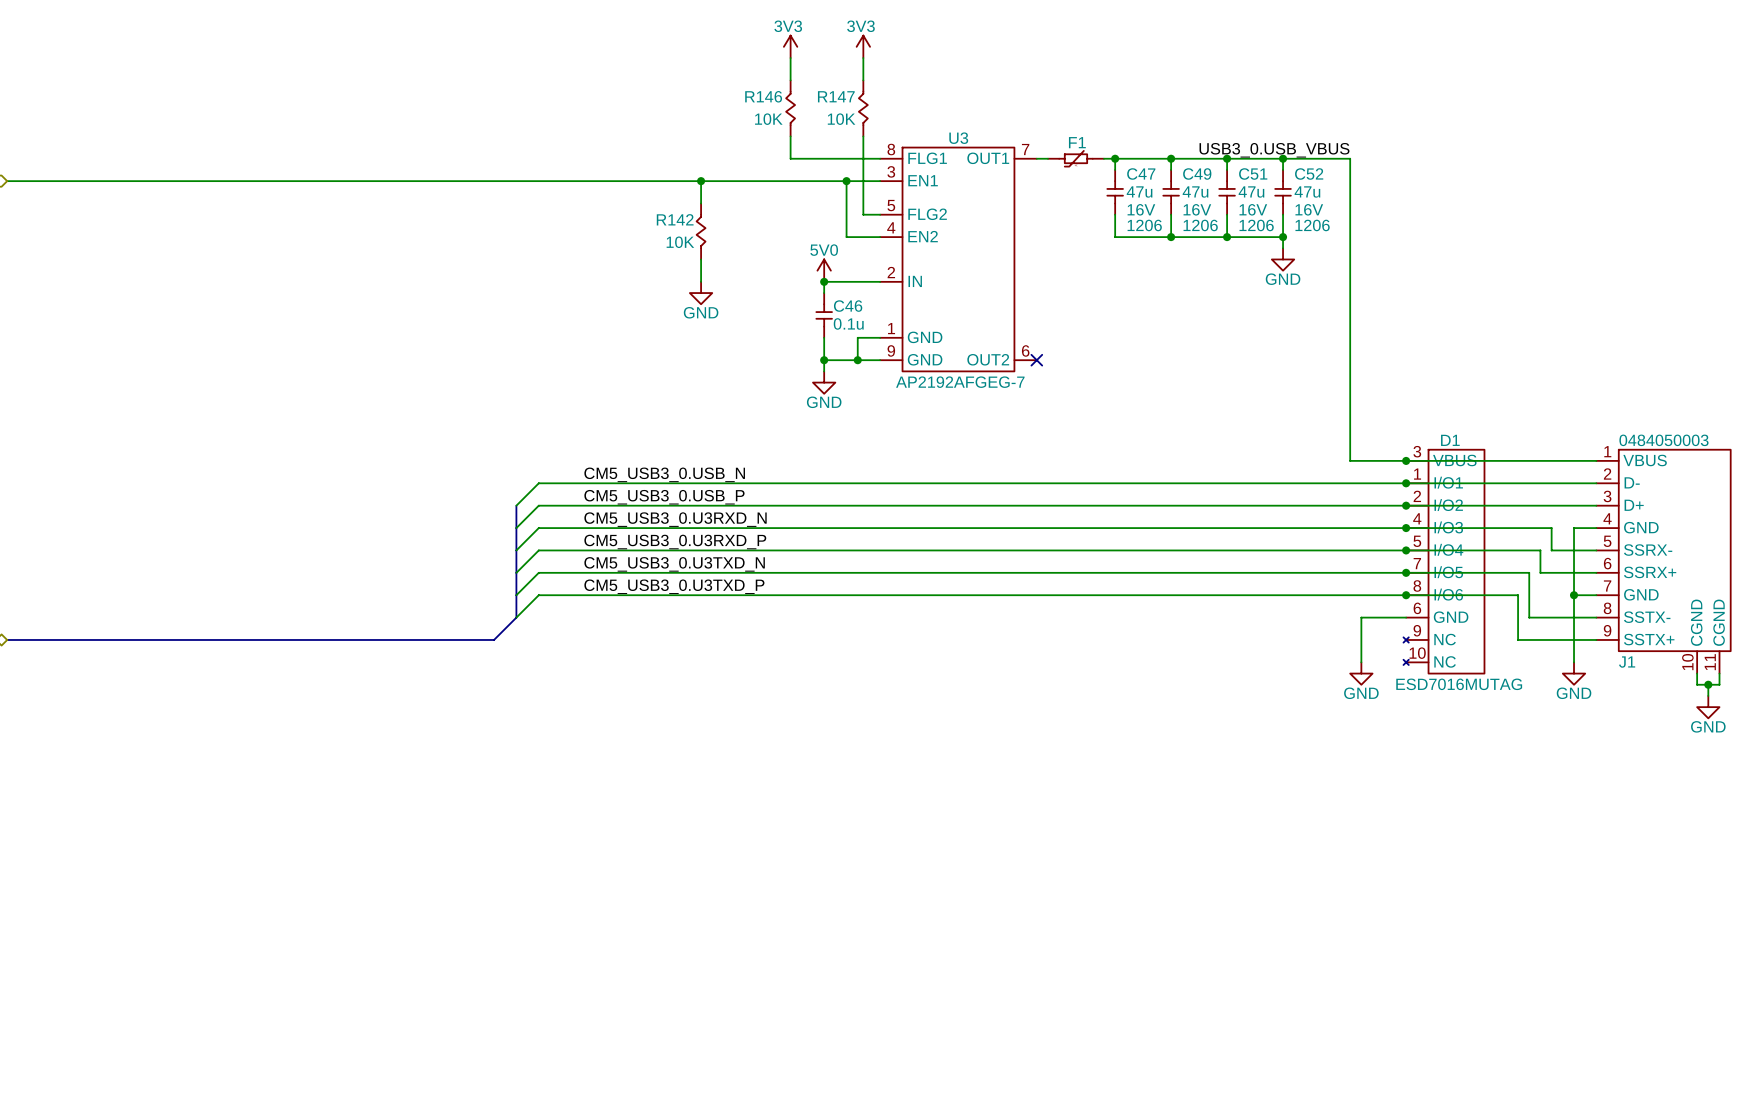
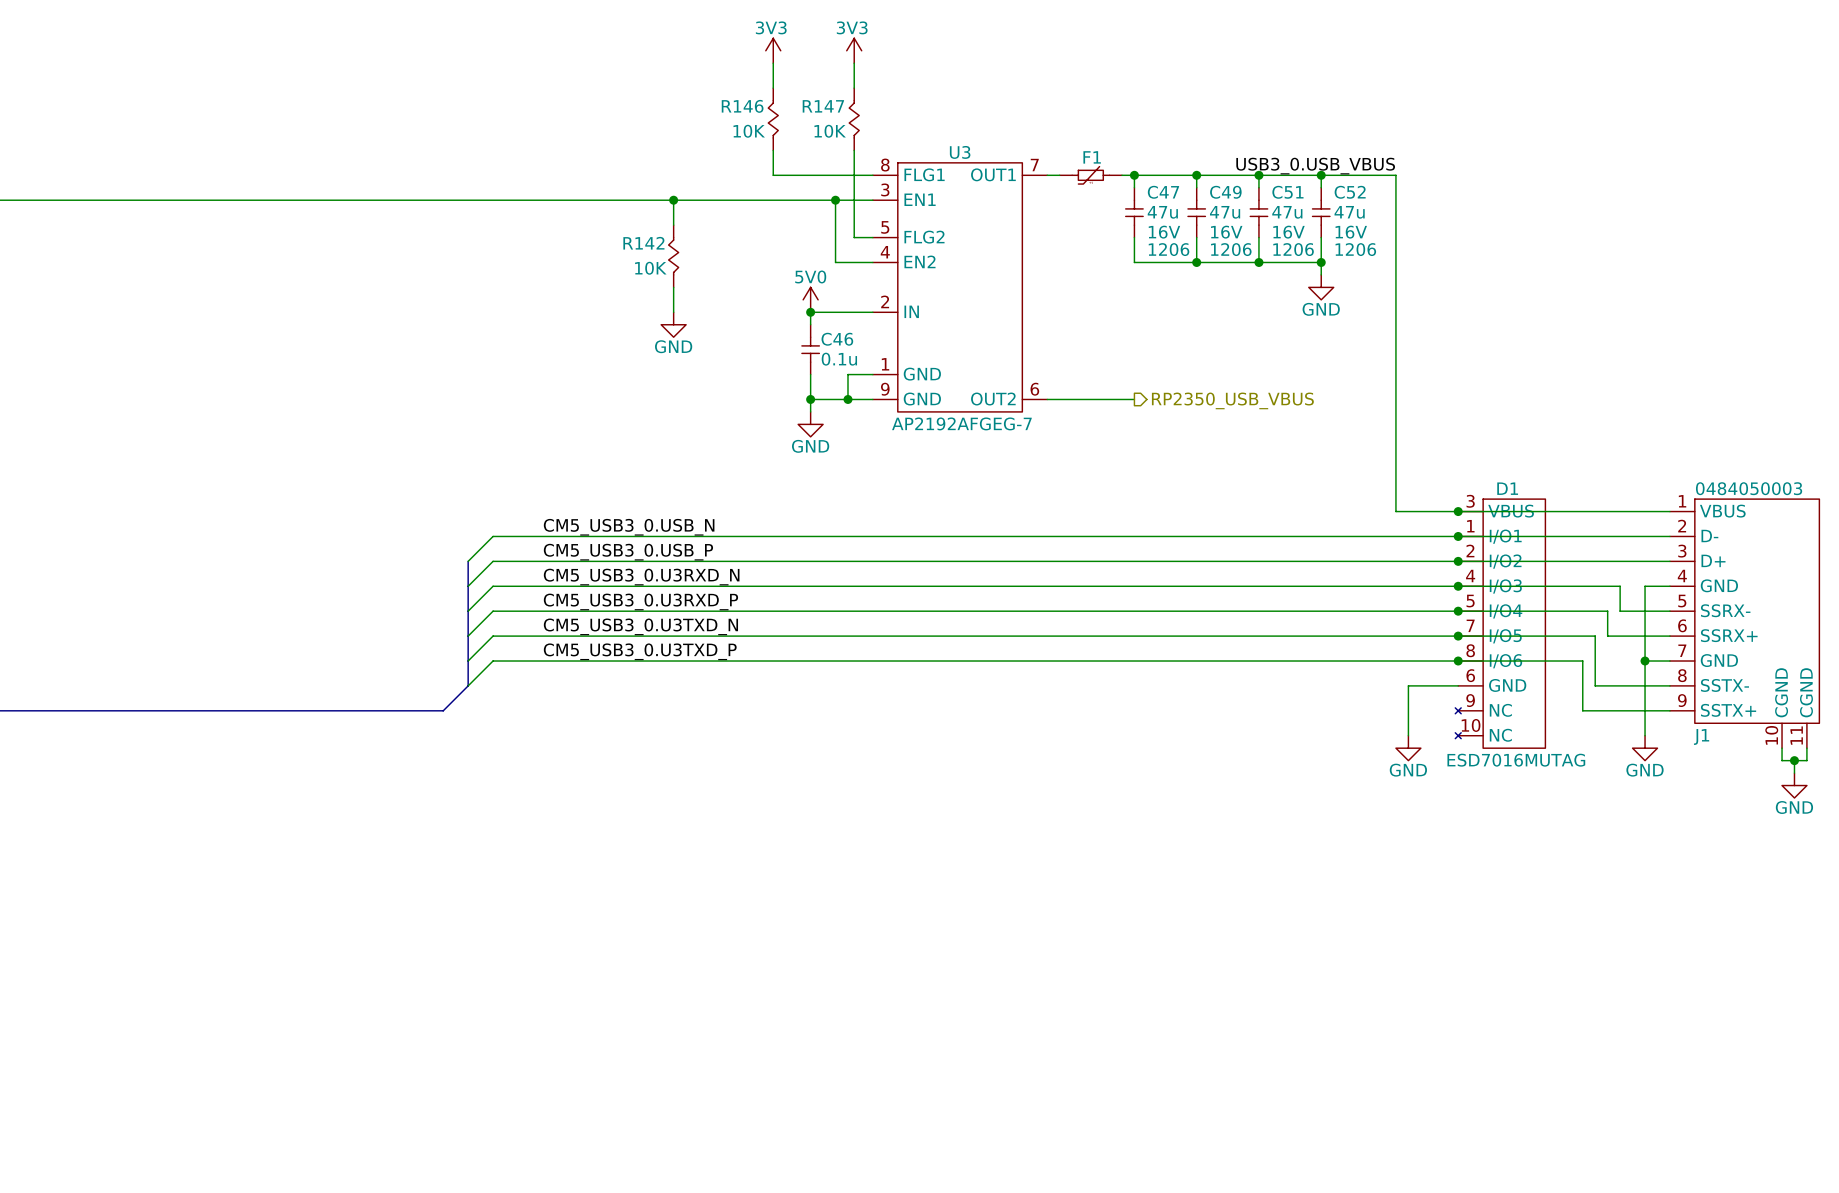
wire: none -> (1047, 399) (1134, 399)
no-connect mark: (1036, 360) -> none
hierarchical label: none -> RP2350_USB_VBUS (1232, 400)

